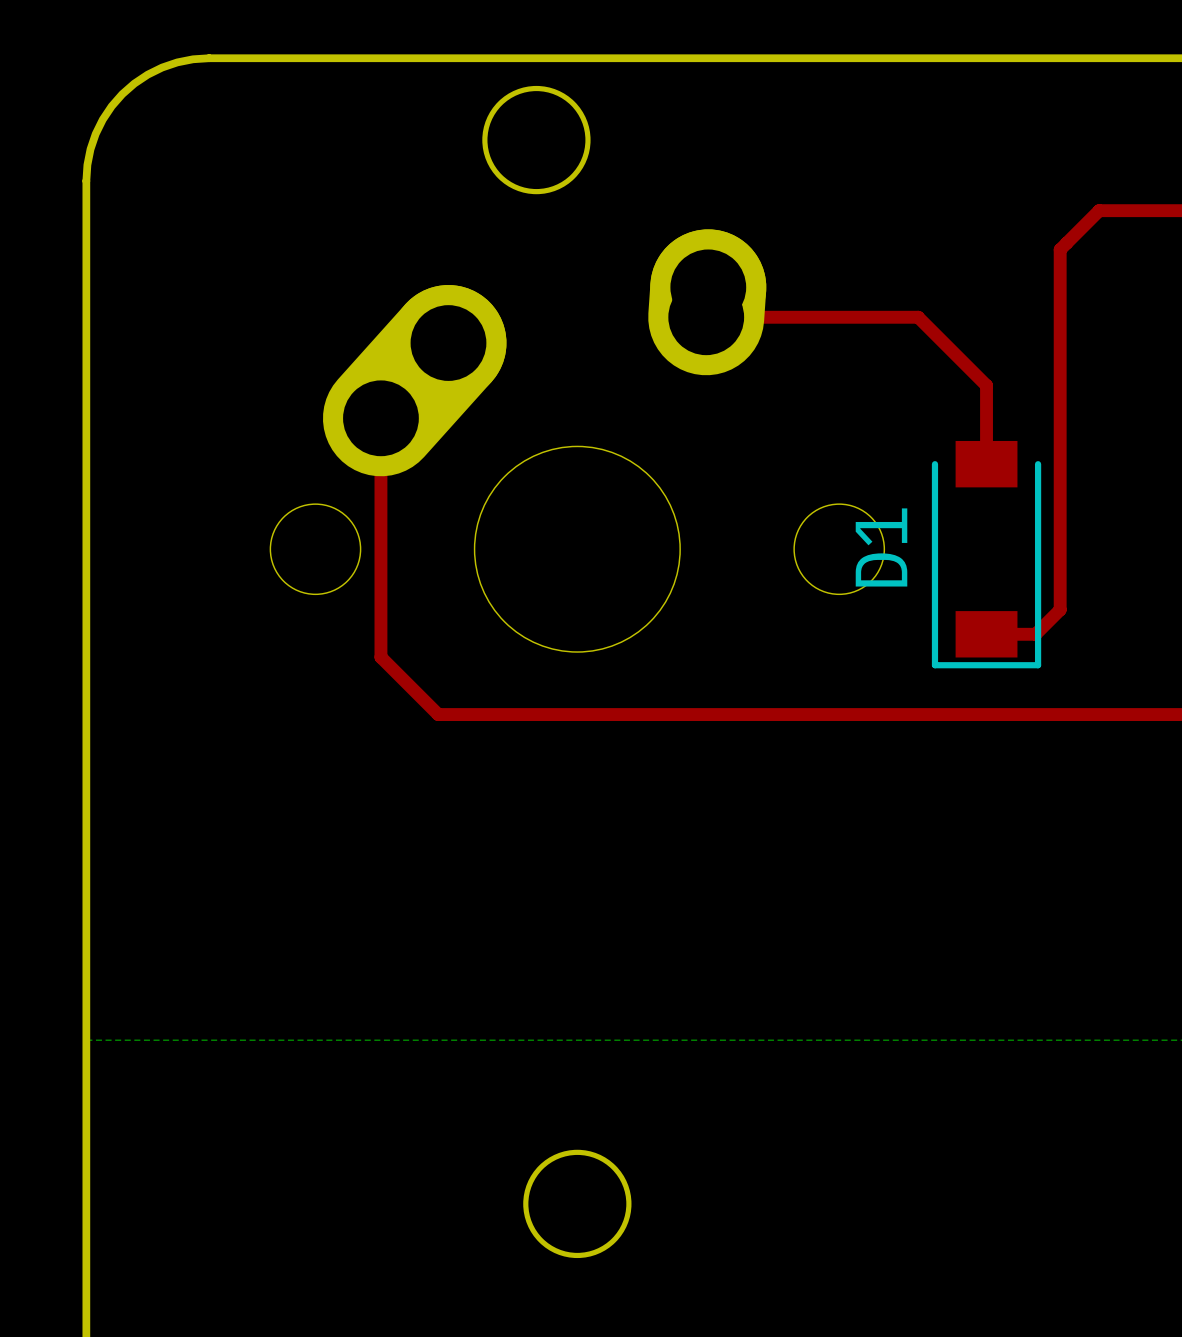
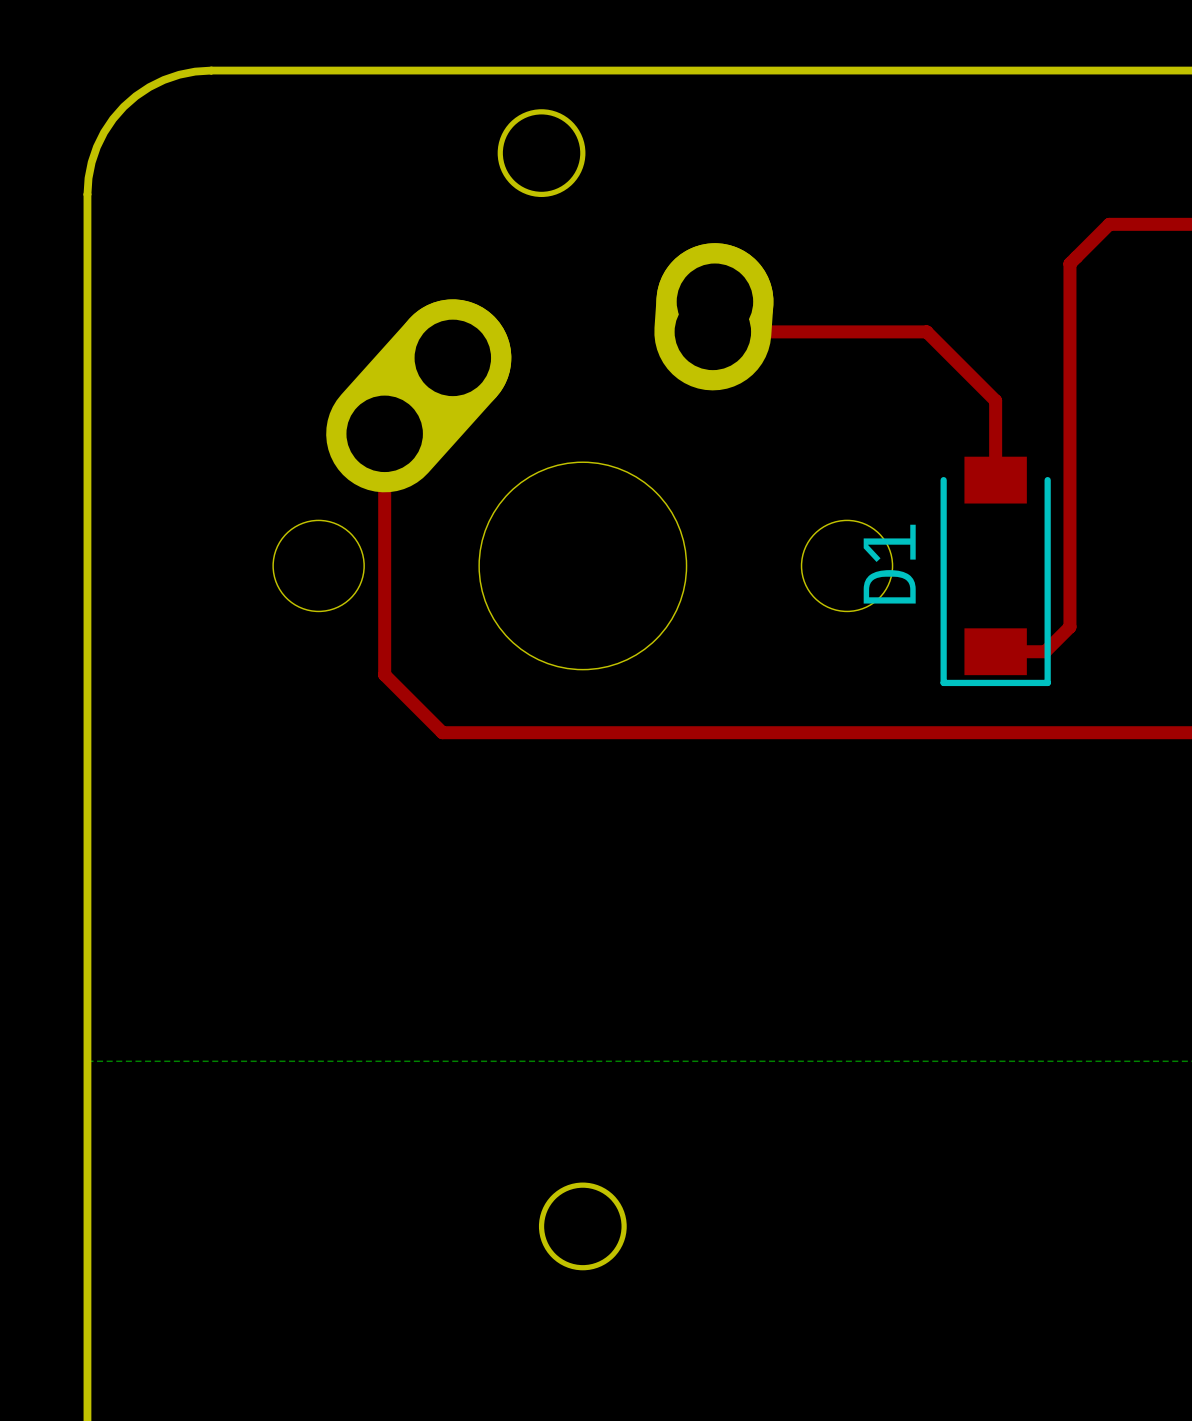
round board edge size: [482, 85, 591, 195] -> [497, 109, 586, 197]
round board edge size: [523, 1149, 632, 1259] -> [538, 1182, 627, 1271]

